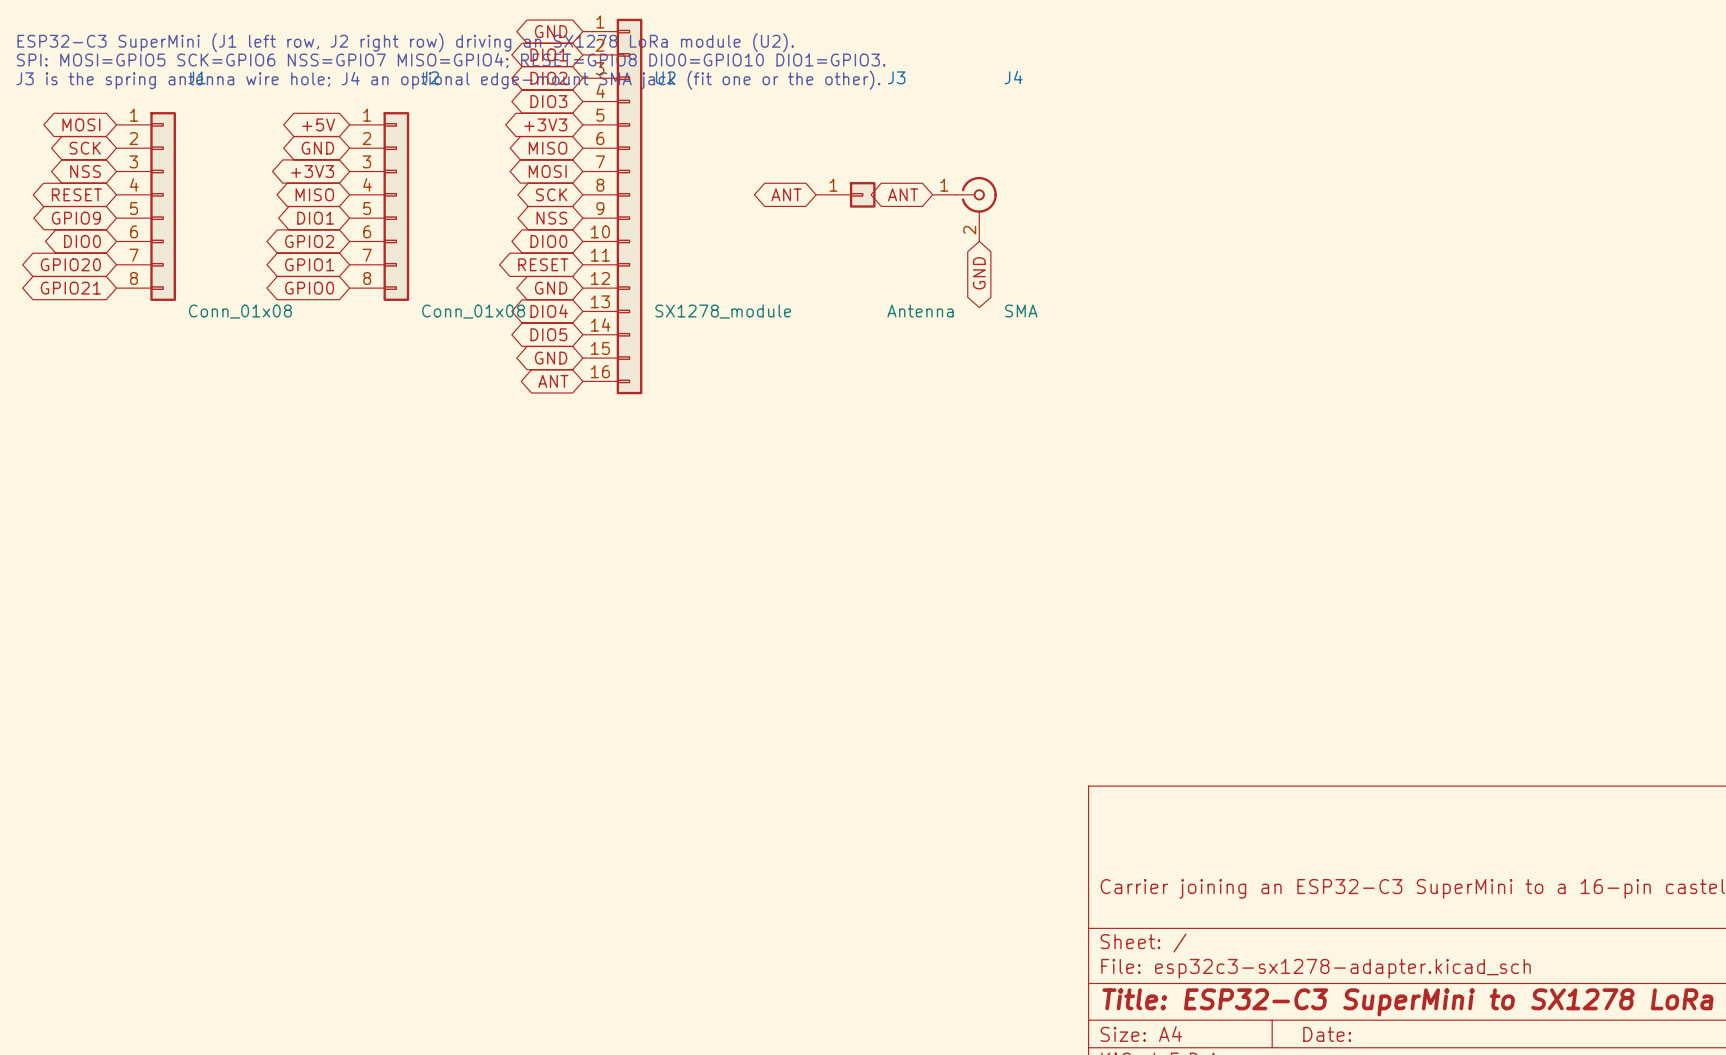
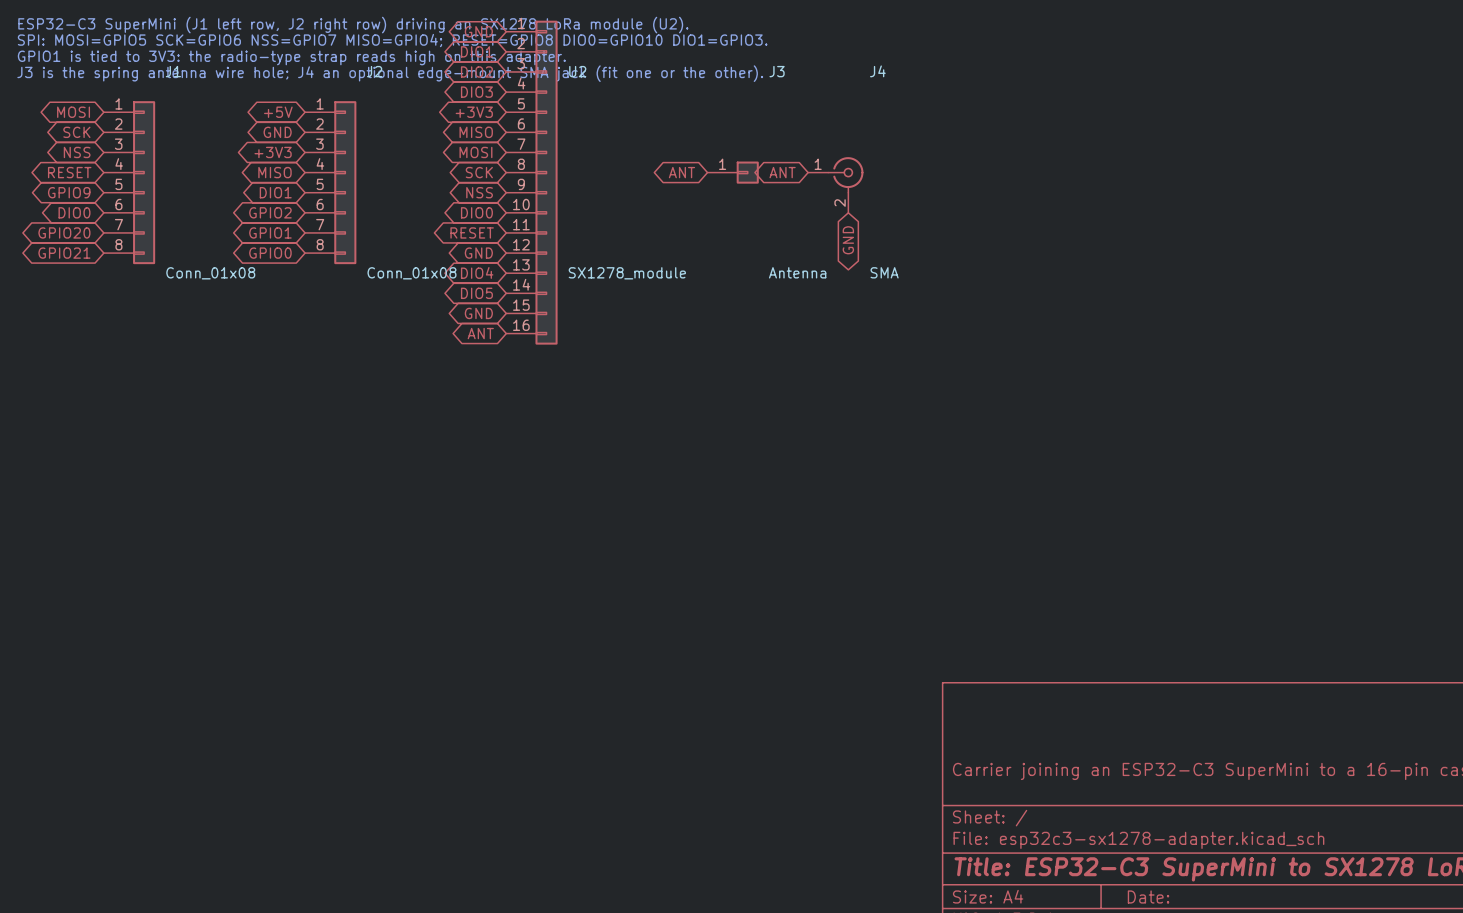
text: none -> ESP32-C3 SuperMini (J1 left row, J2 right row) driving an SX1278 LoRa module (U2). (353, 25)
text: ESP32-C3 SuperMini (J1 left row, J2 right row) driving an SX1278 LoRa module (U2). (405, 42) -> SPI: MOSI=GPIO5 SCK=GPIO6 NSS=GPIO7 MISO=GPIO4; RESET=GPIO8 DIO0=GPIO10 DIO1=GPIO3. (392, 40)
text: SPI: MOSI=GPIO5 SCK=GPIO6 NSS=GPIO7 MISO=GPIO4; RESET=GPIO8 DIO0=GPIO10 DIO1=GPIO3. (451, 60) -> GPIO1 is tied to 3V3: the radio-type strap reads high on this adapter. (291, 57)

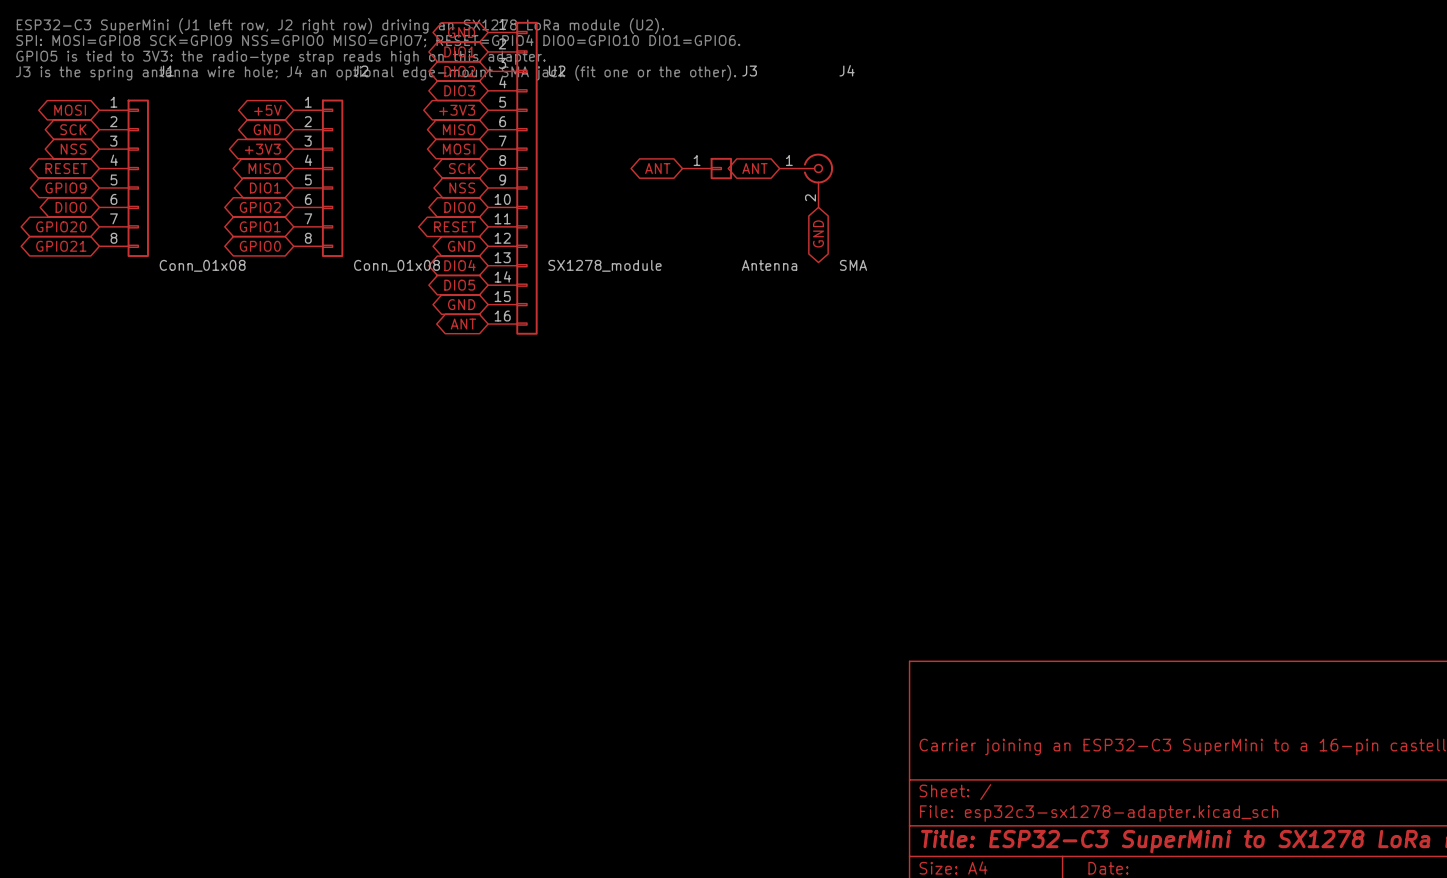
text: SPI: MOSI=GPIO5 SCK=GPIO6 NSS=GPIO7 MISO=GPIO4; RESET=GPIO8 DIO0=GPIO10 DIO1=GPIO3. (392, 40) -> SPI: MOSI=GPIO8 SCK=GPIO9 NSS=GPIO0 MISO=GPIO7; RESET=GPIO4 DIO0=GPIO10 DIO1=GPIO6. (378, 41)
text: GPIO1 is tied to 3V3: the radio-type strap reads high on this adapter. (291, 57) -> GPIO5 is tied to 3V3: the radio-type strap reads high on this adapter. (280, 57)

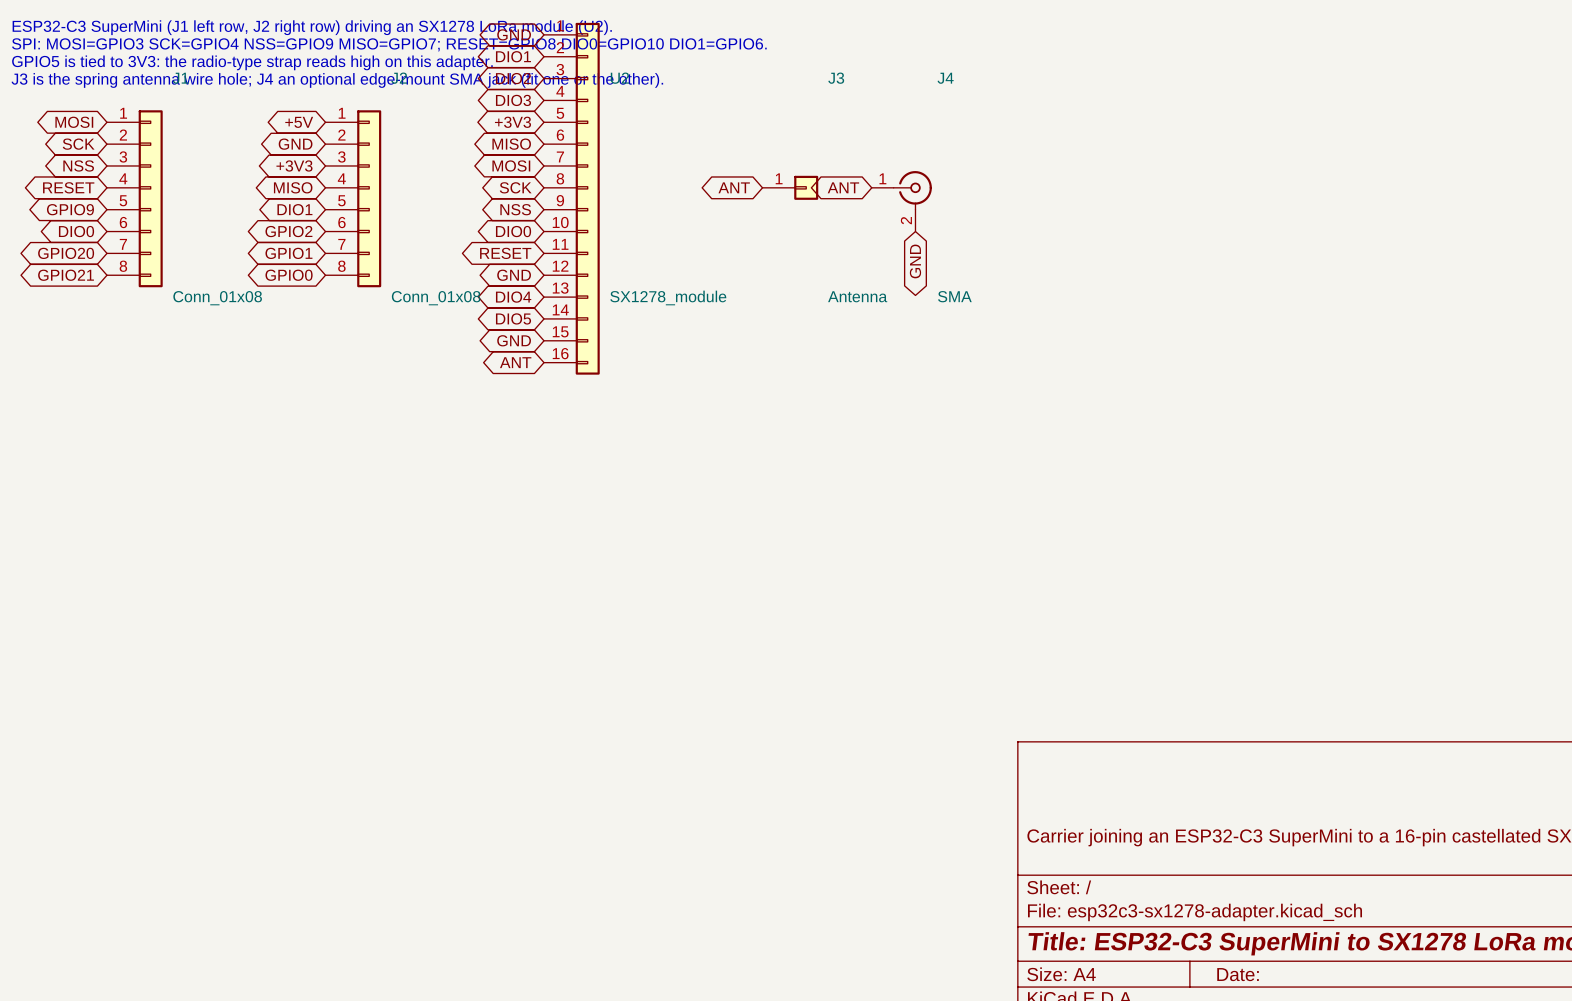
text: SPI: MOSI=GPIO8 SCK=GPIO9 NSS=GPIO0 MISO=GPIO7; RESET=GPIO4 DIO0=GPIO10 DIO1=GPIO6. (378, 41) -> SPI: MOSI=GPIO3 SCK=GPIO4 NSS=GPIO9 MISO=GPIO7; RESET=GPIO8 DIO0=GPIO10 DIO1=GPIO6. (389, 44)

